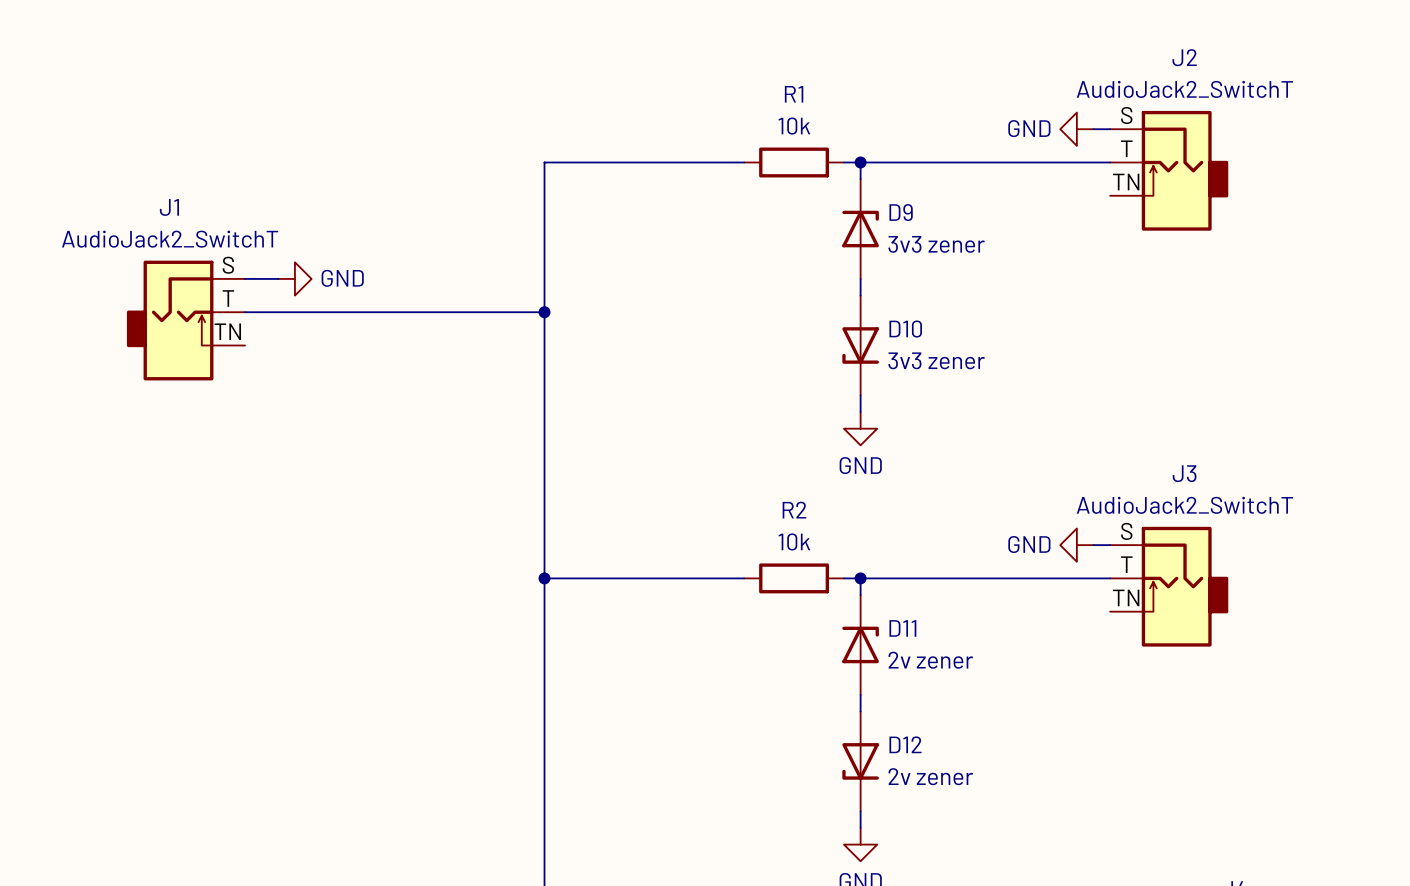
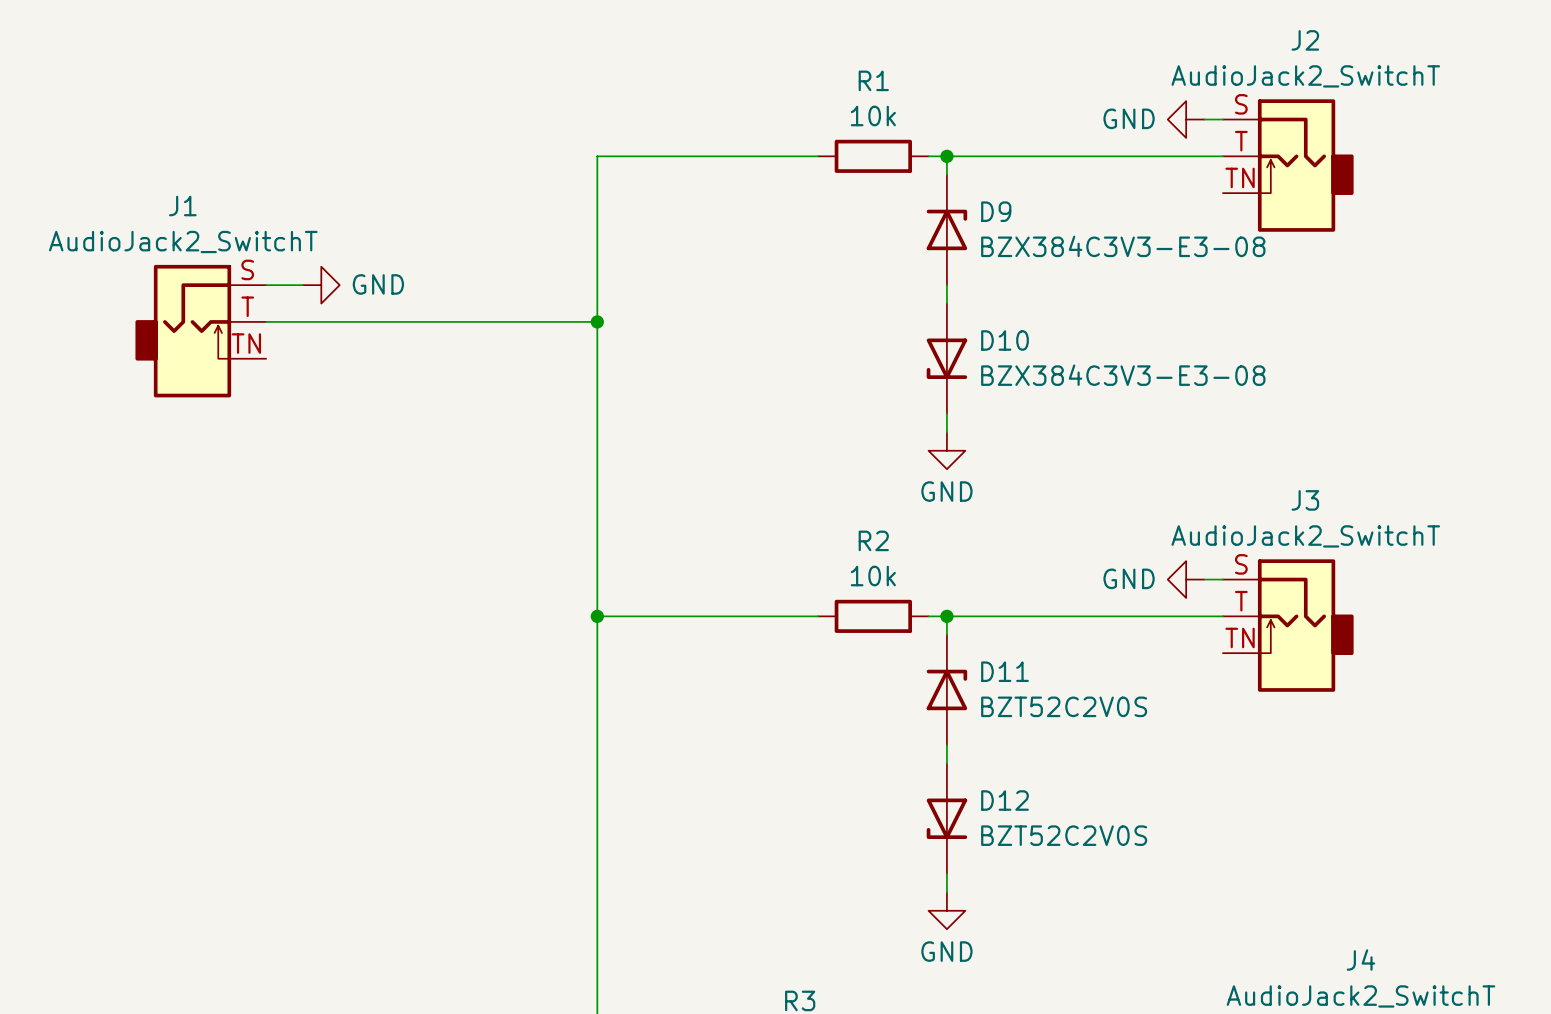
D9 value: 3v3 zener (936, 244) -> BZX384C3V3-E3-08 (1123, 246)
D10 value: 3v3 zener (936, 360) -> BZX384C3V3-E3-08 (1123, 375)
D11 value: 2v zener (930, 660) -> BZT52C2V0S (1064, 706)
D12 value: 2v zener (930, 776) -> BZT52C2V0S (1064, 835)

